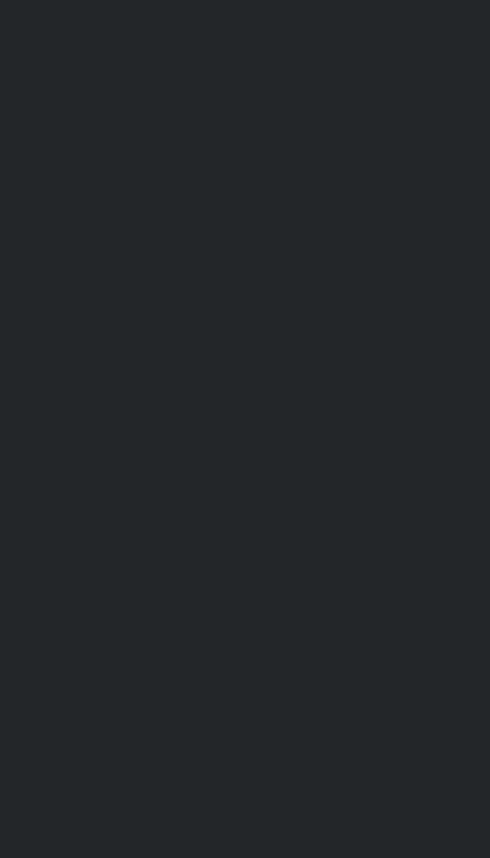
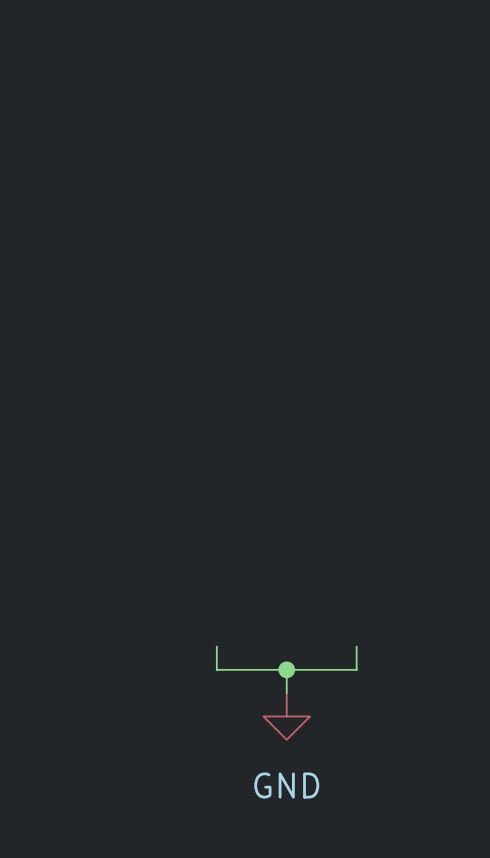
wire: none -> (216, 646) (216, 669) (356, 669) (356, 646)
wire: none -> (286, 669) (286, 693)
junction: none -> (286, 669)
power symbol: none -> GND (286, 716)

